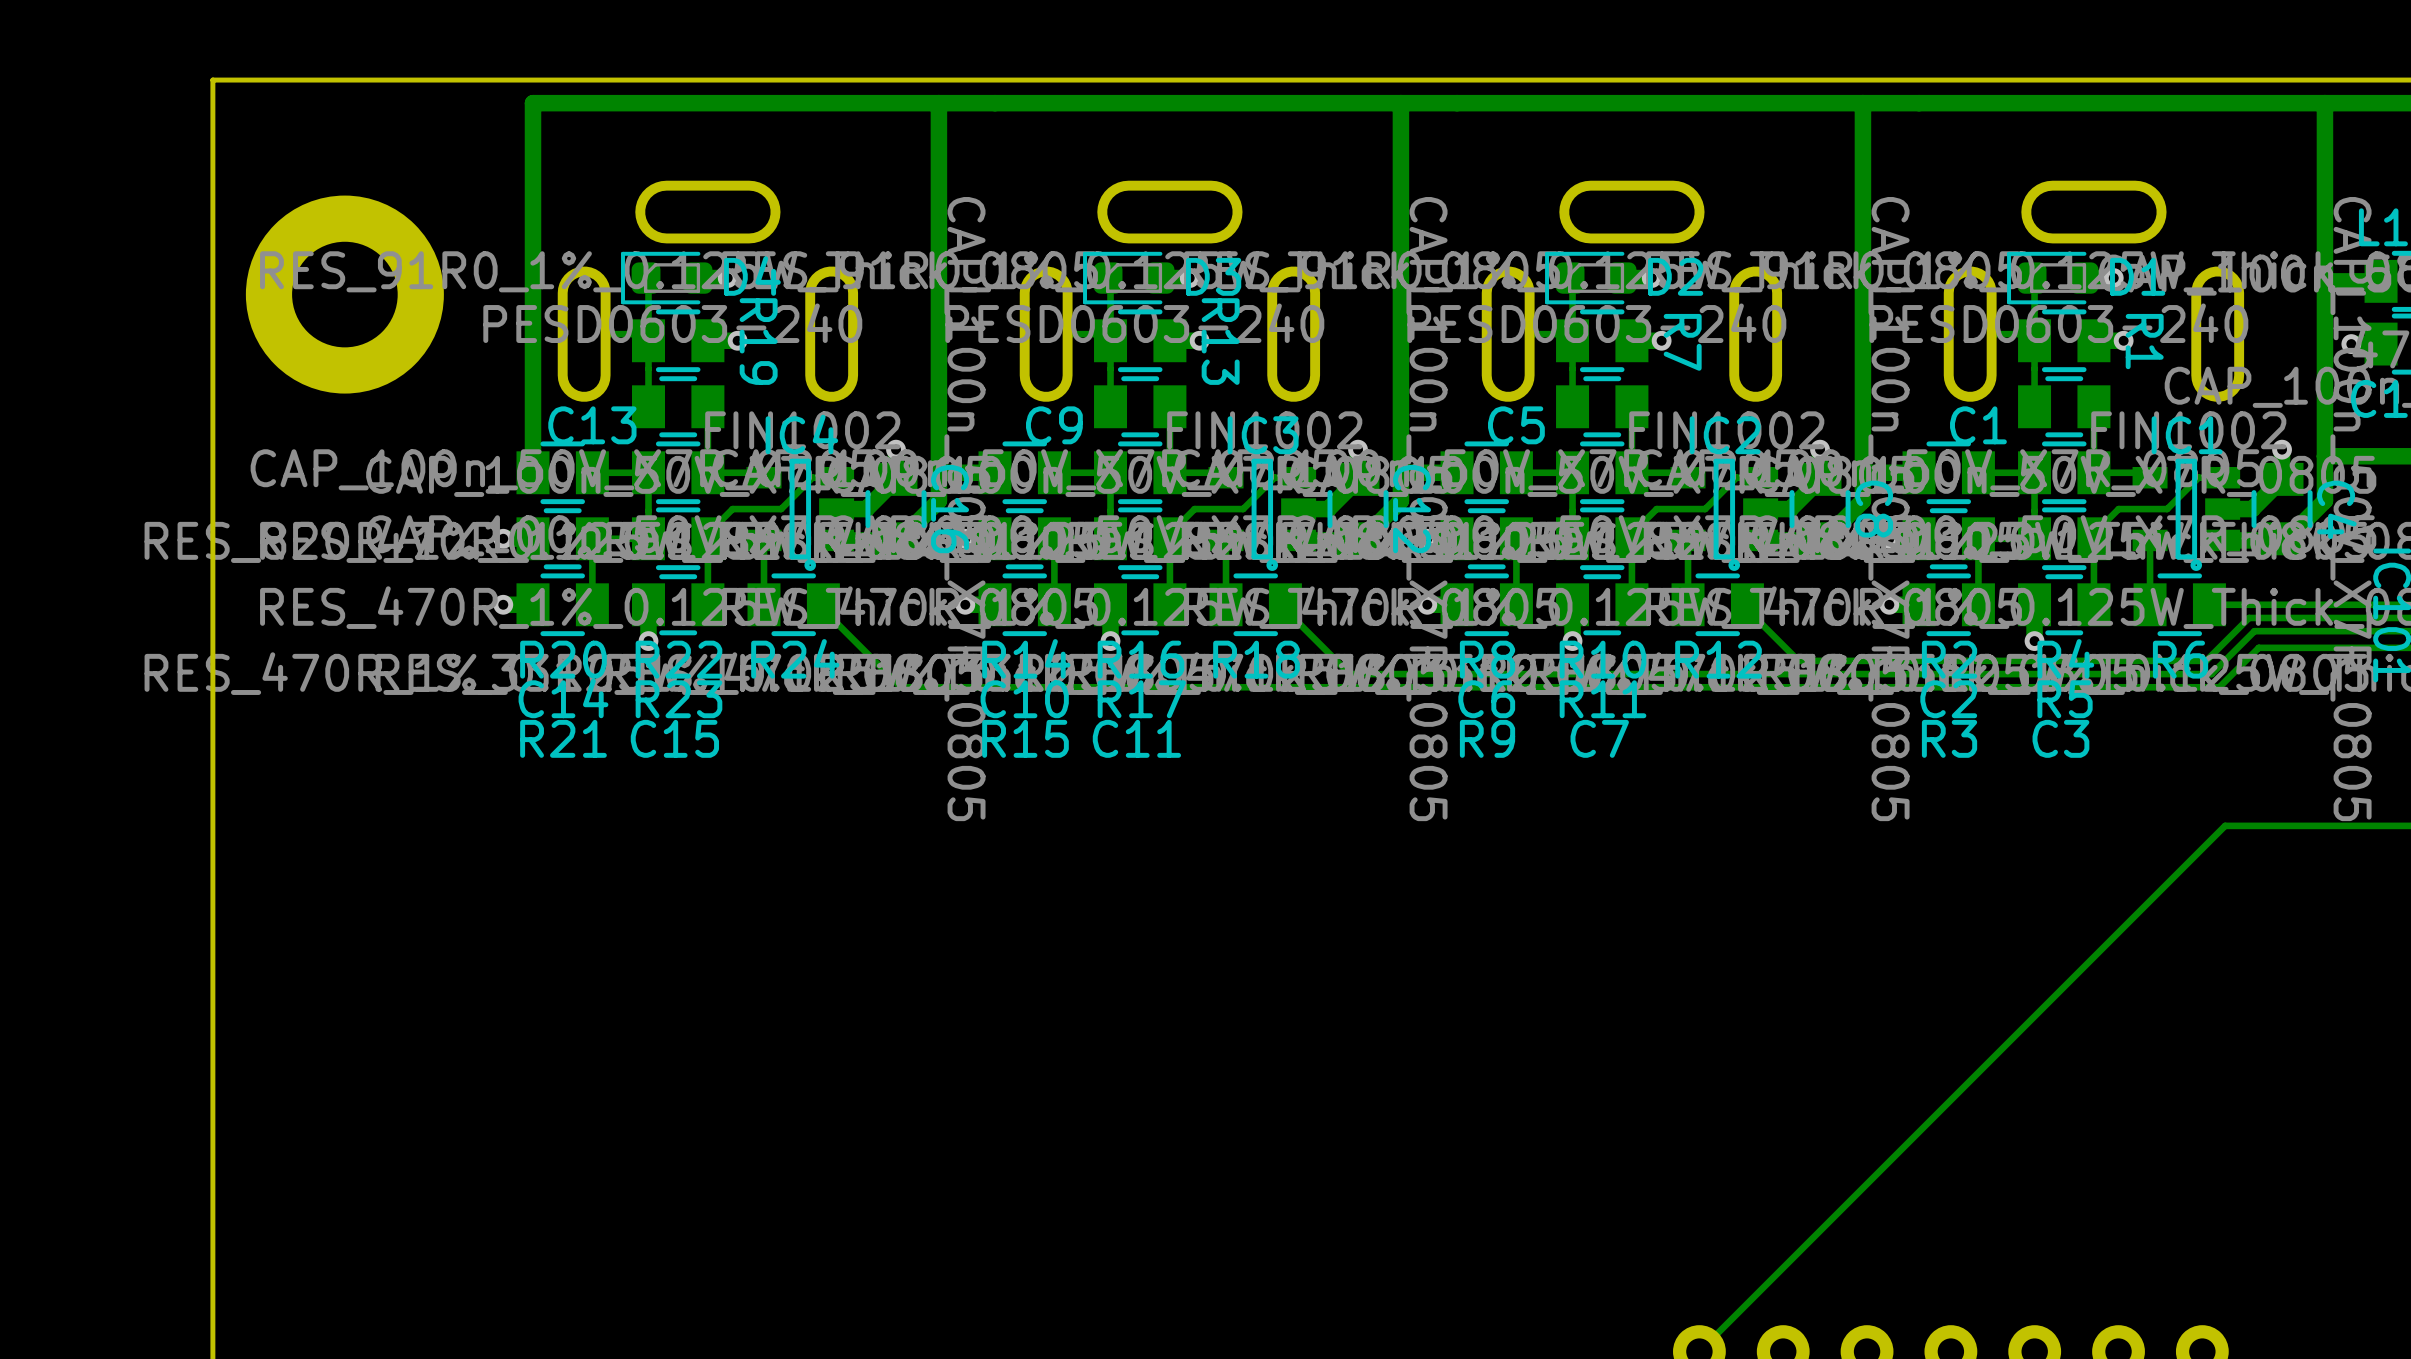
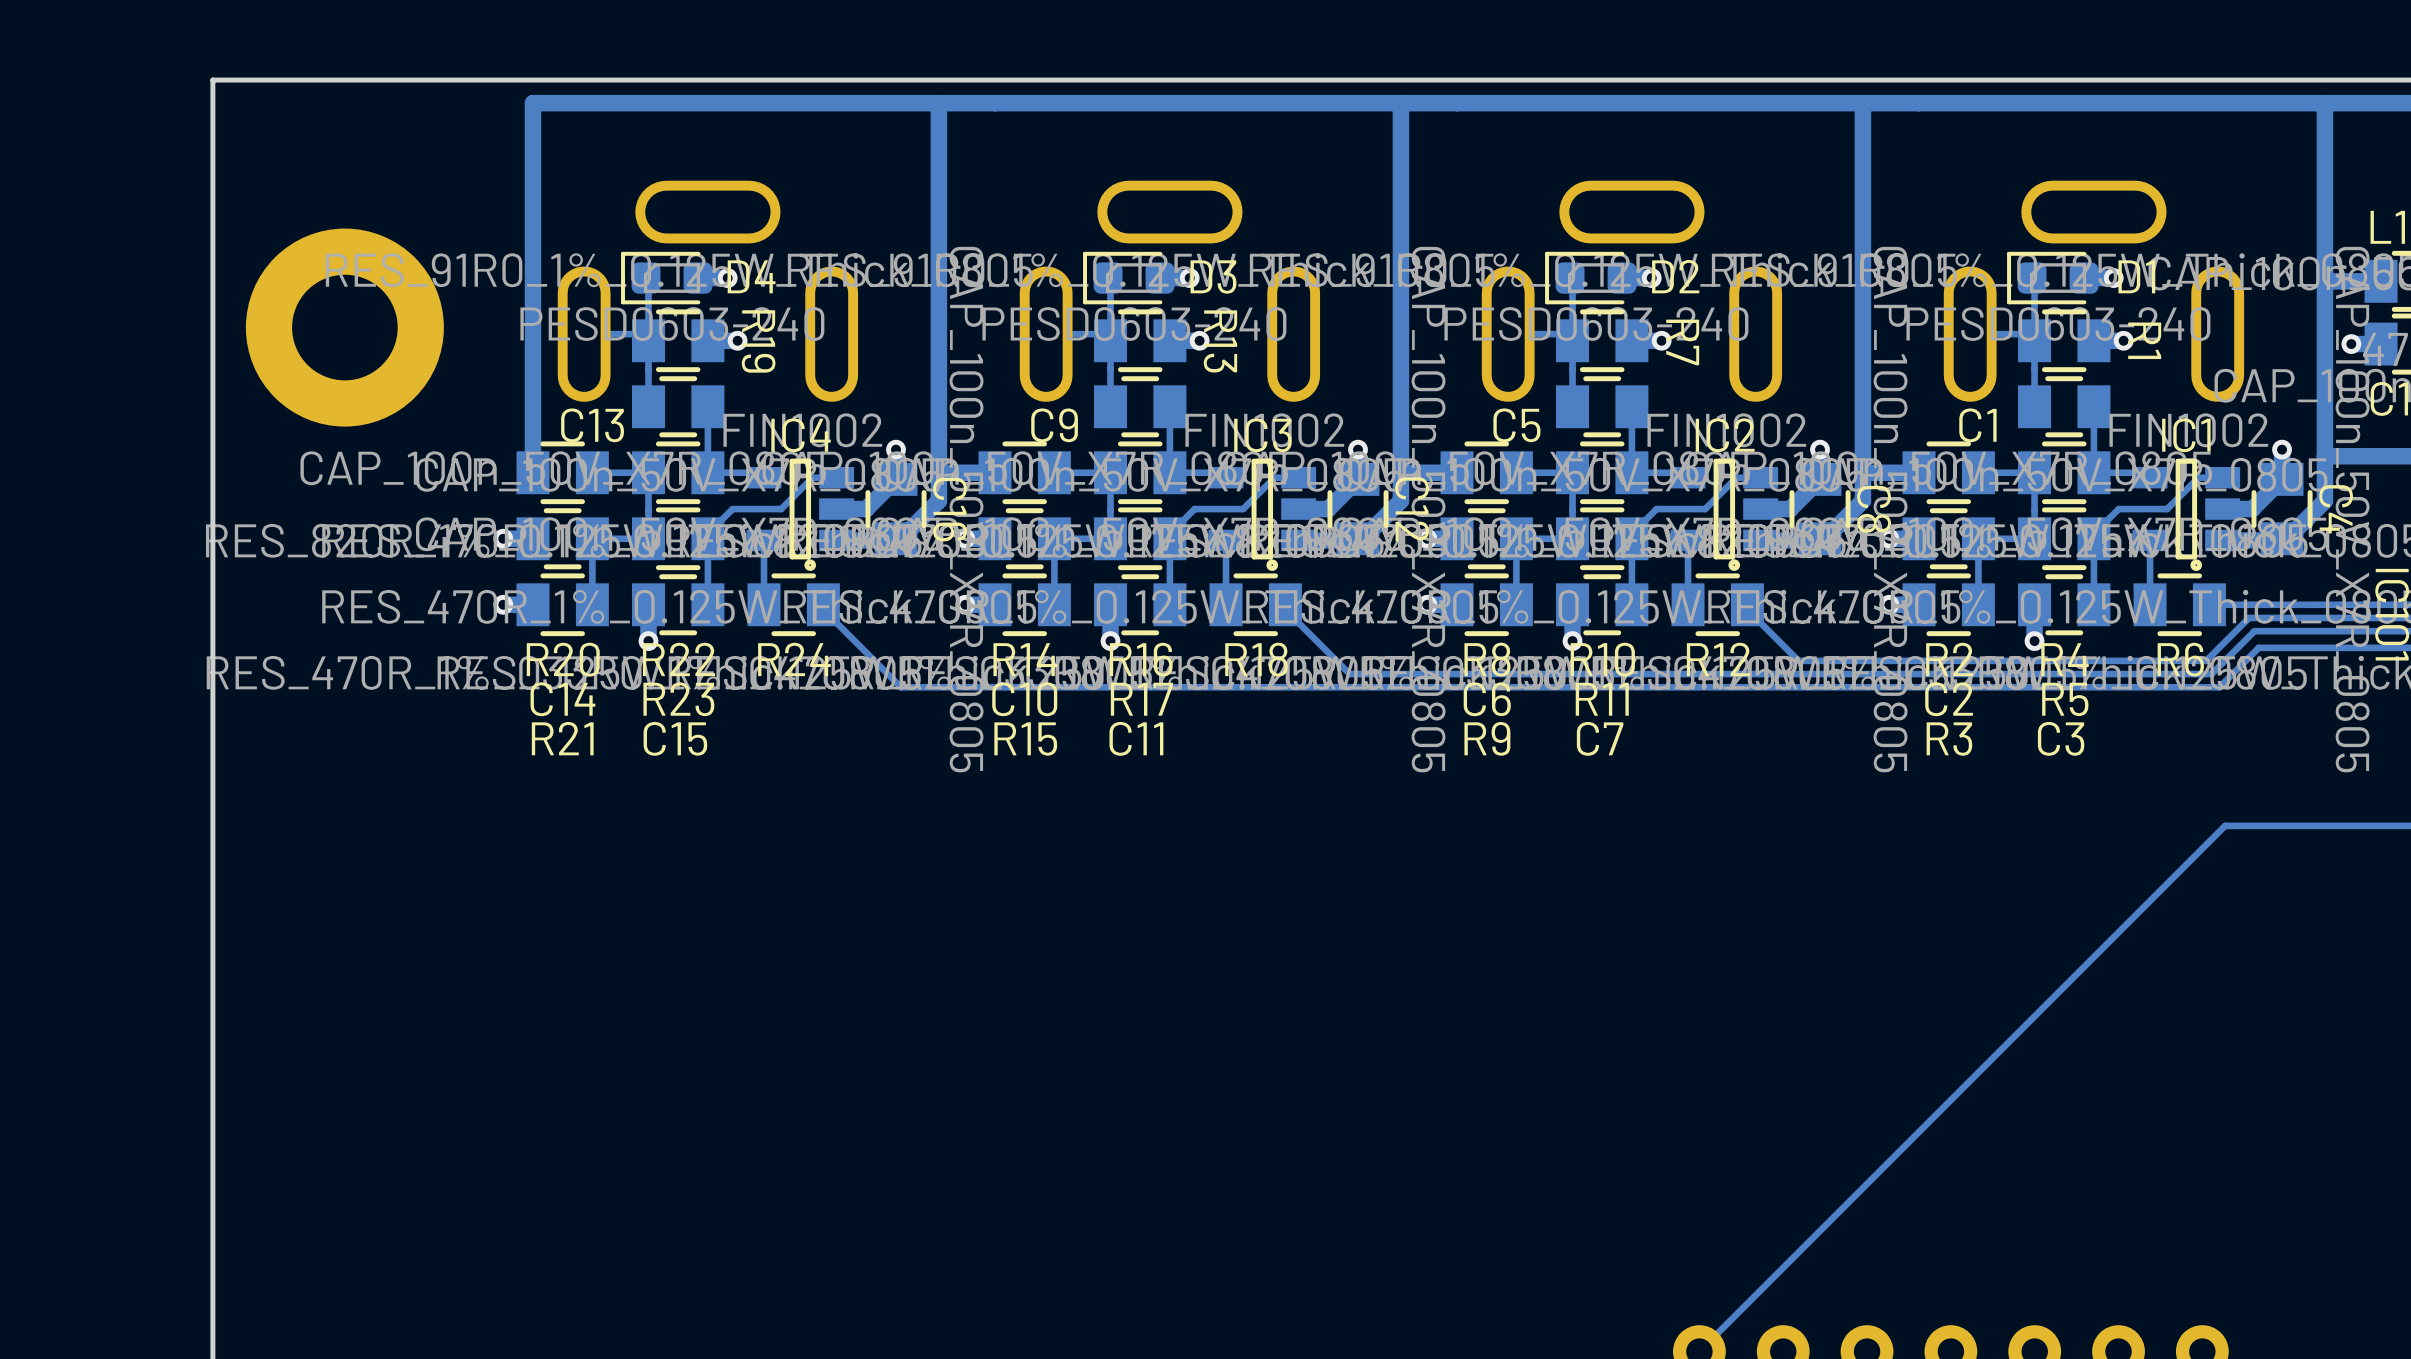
part position: (344, 294) -> (344, 327)

